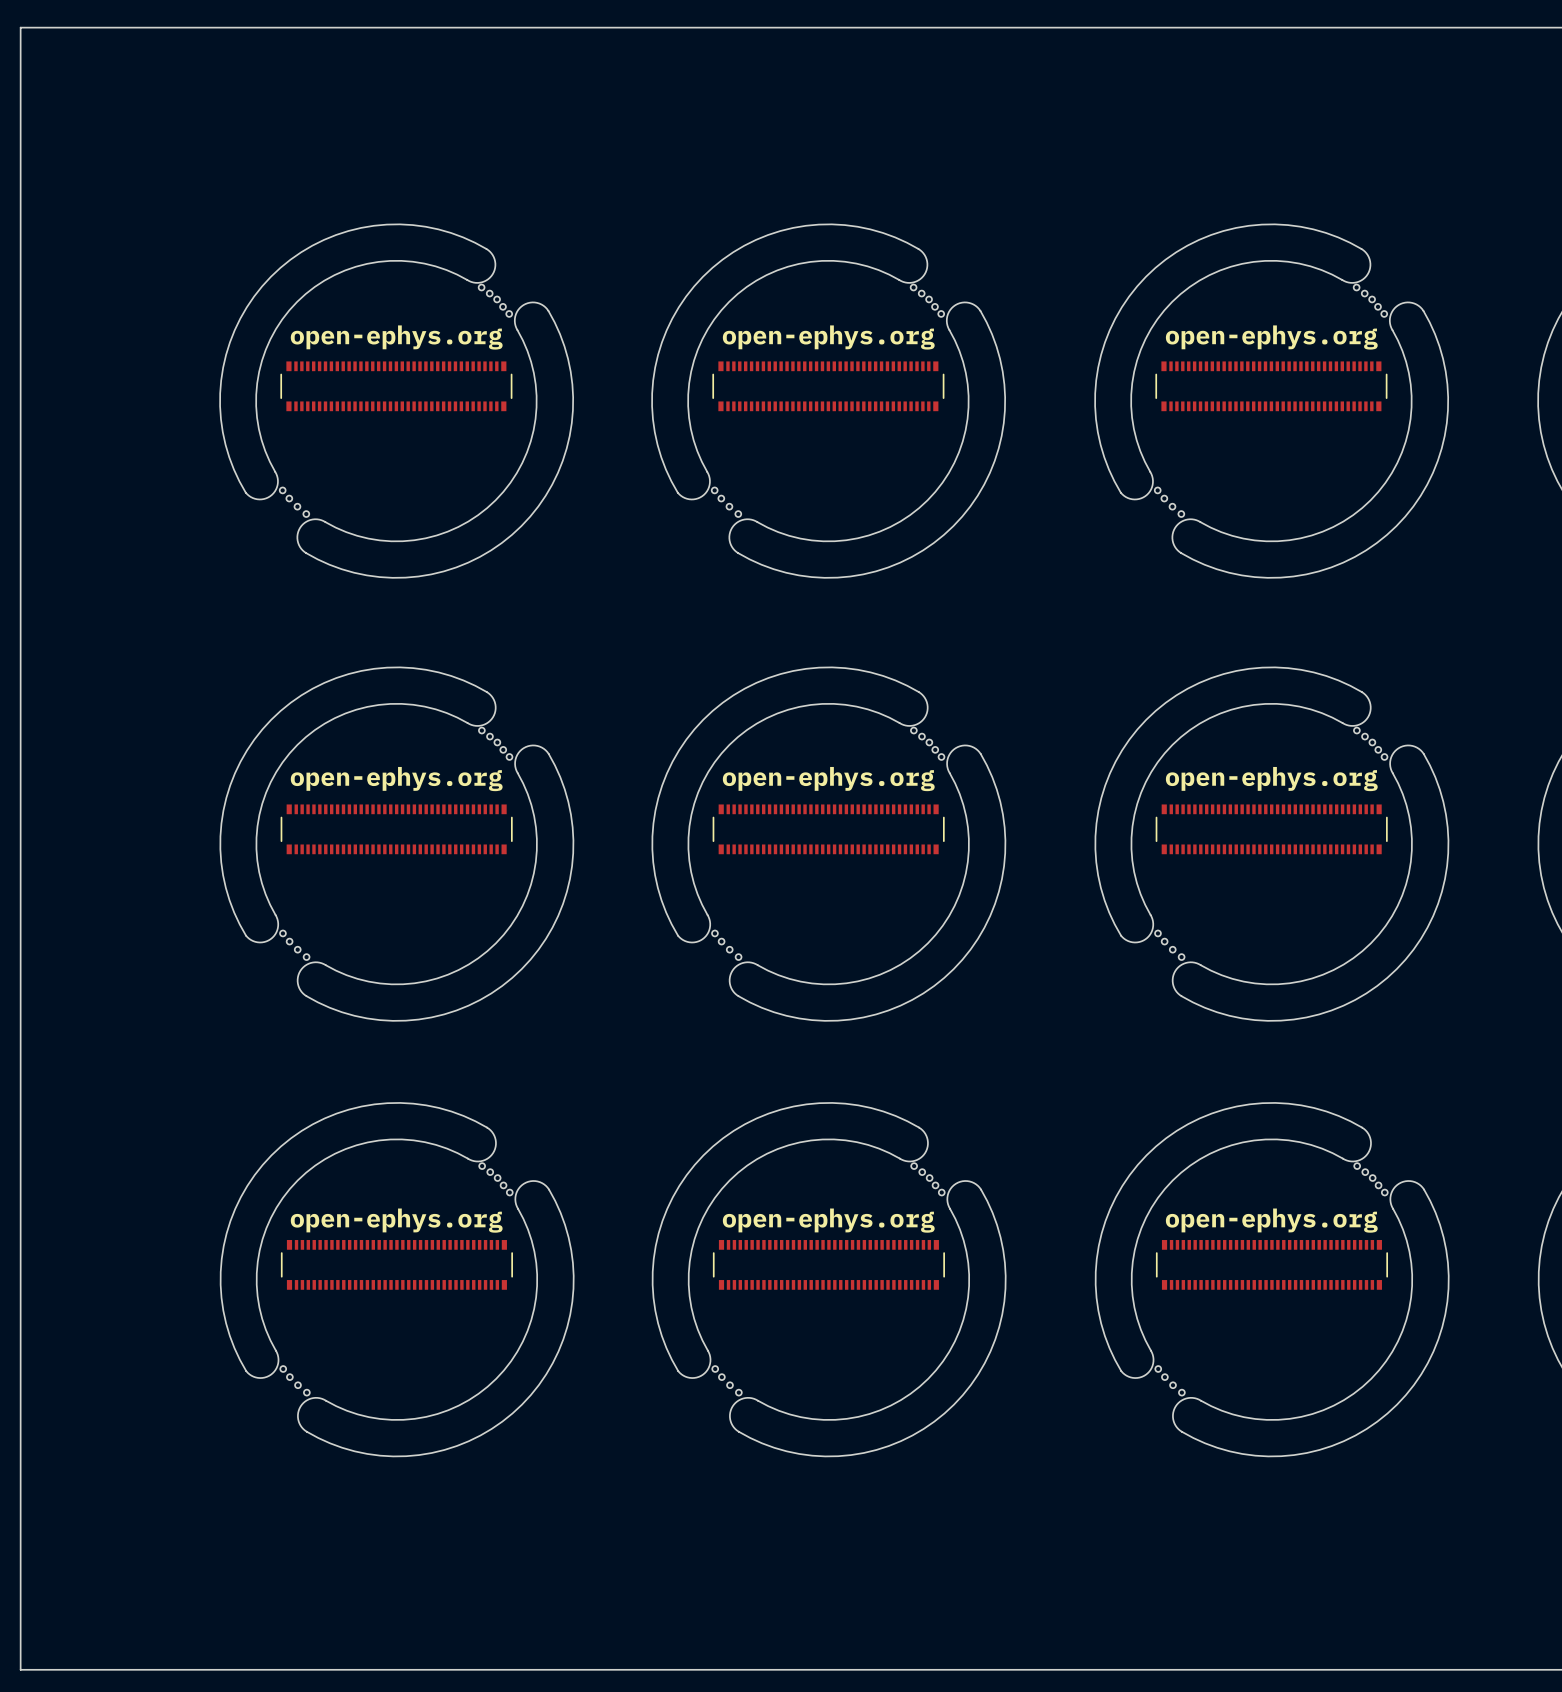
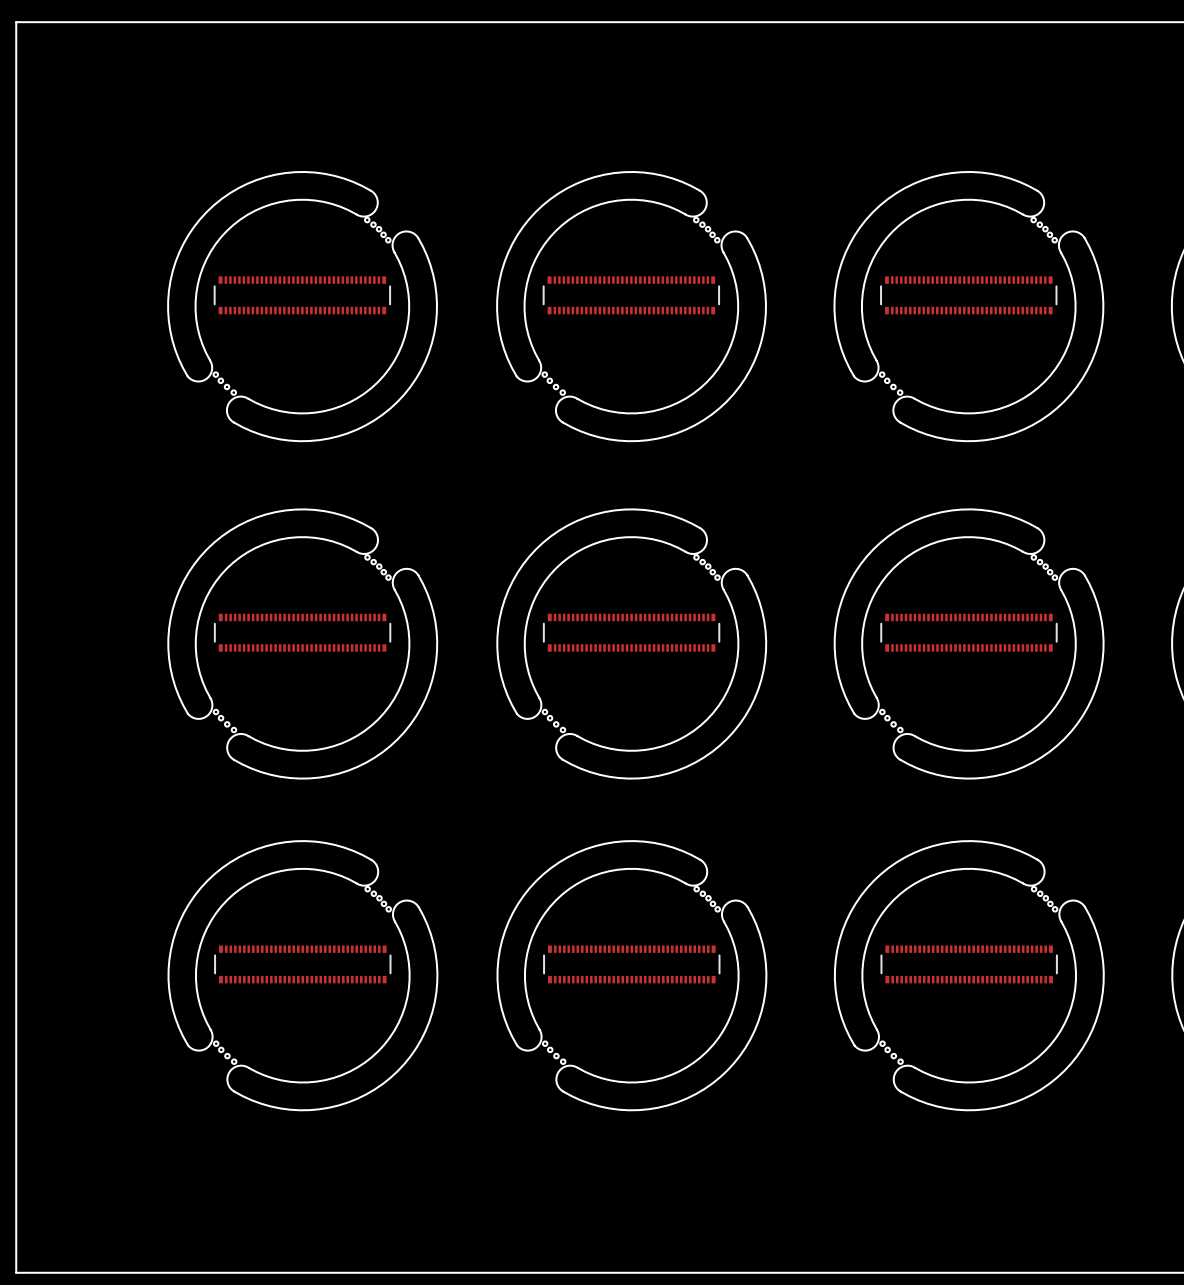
text: open-ephys.org (396, 337) -> none
text: open-ephys.org (828, 337) -> none
text: open-ephys.org (1271, 337) -> none
text: open-ephys.org (396, 779) -> none
text: open-ephys.org (828, 779) -> none
text: open-ephys.org (1271, 779) -> none
text: open-ephys.org (396, 1220) -> none
text: open-ephys.org (828, 1220) -> none
text: open-ephys.org (1271, 1220) -> none

